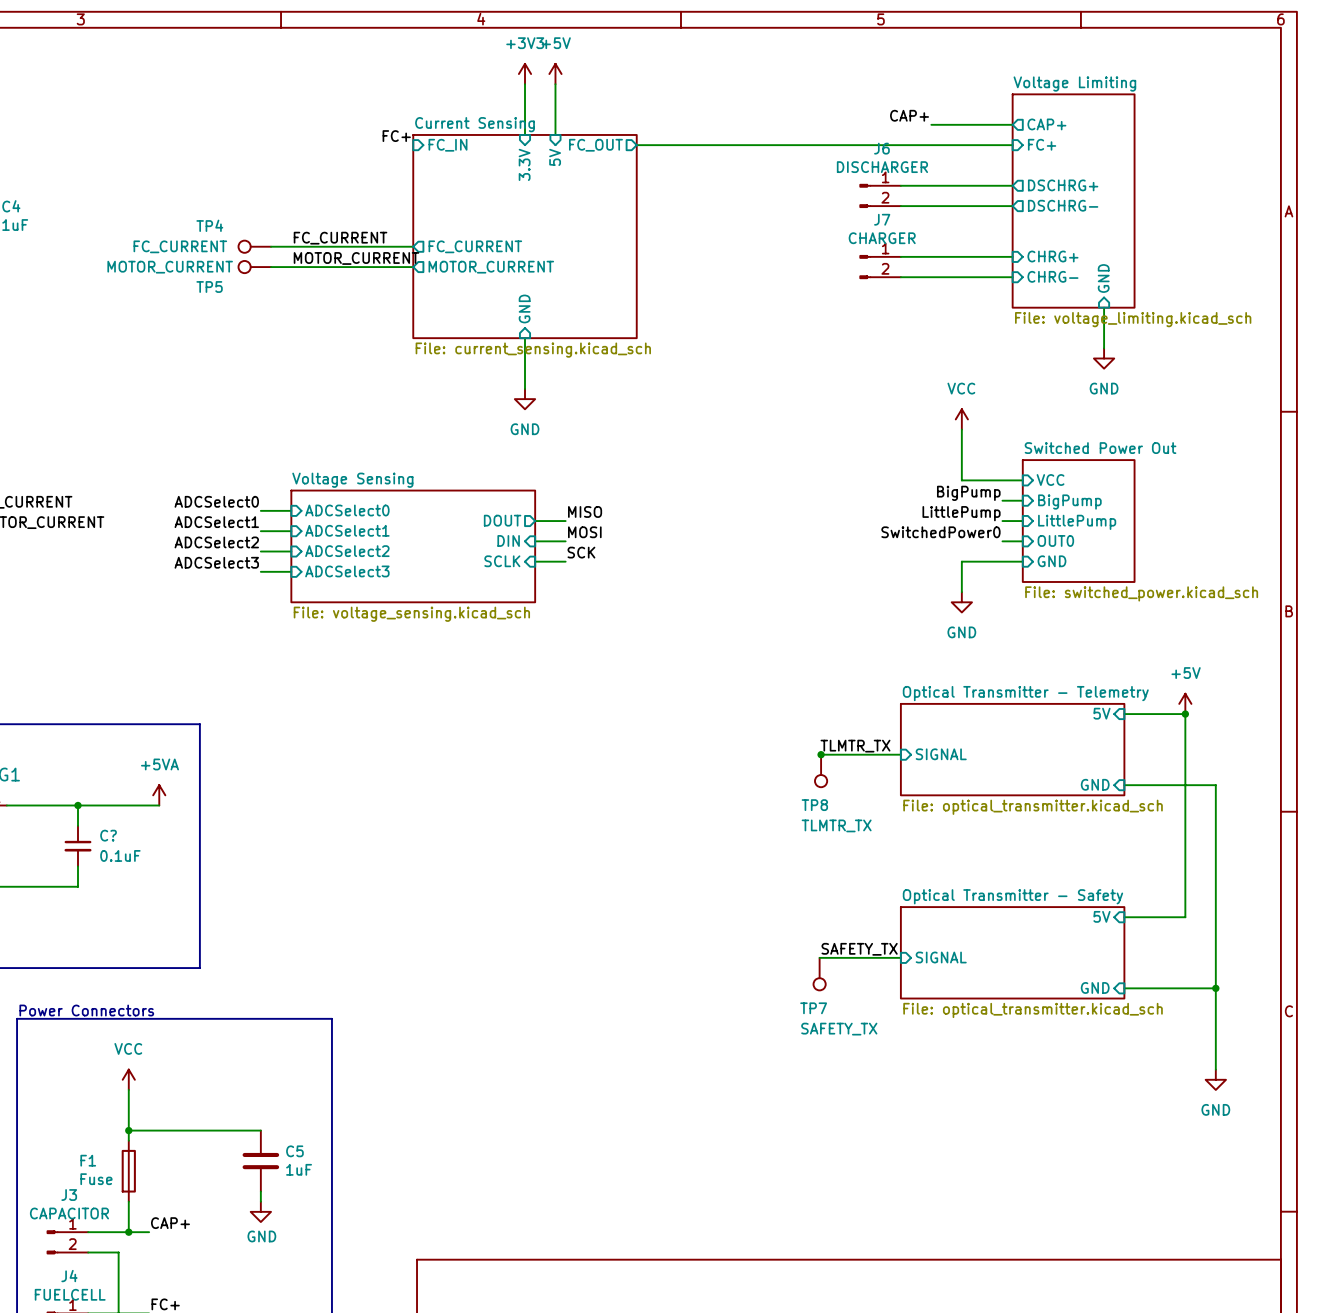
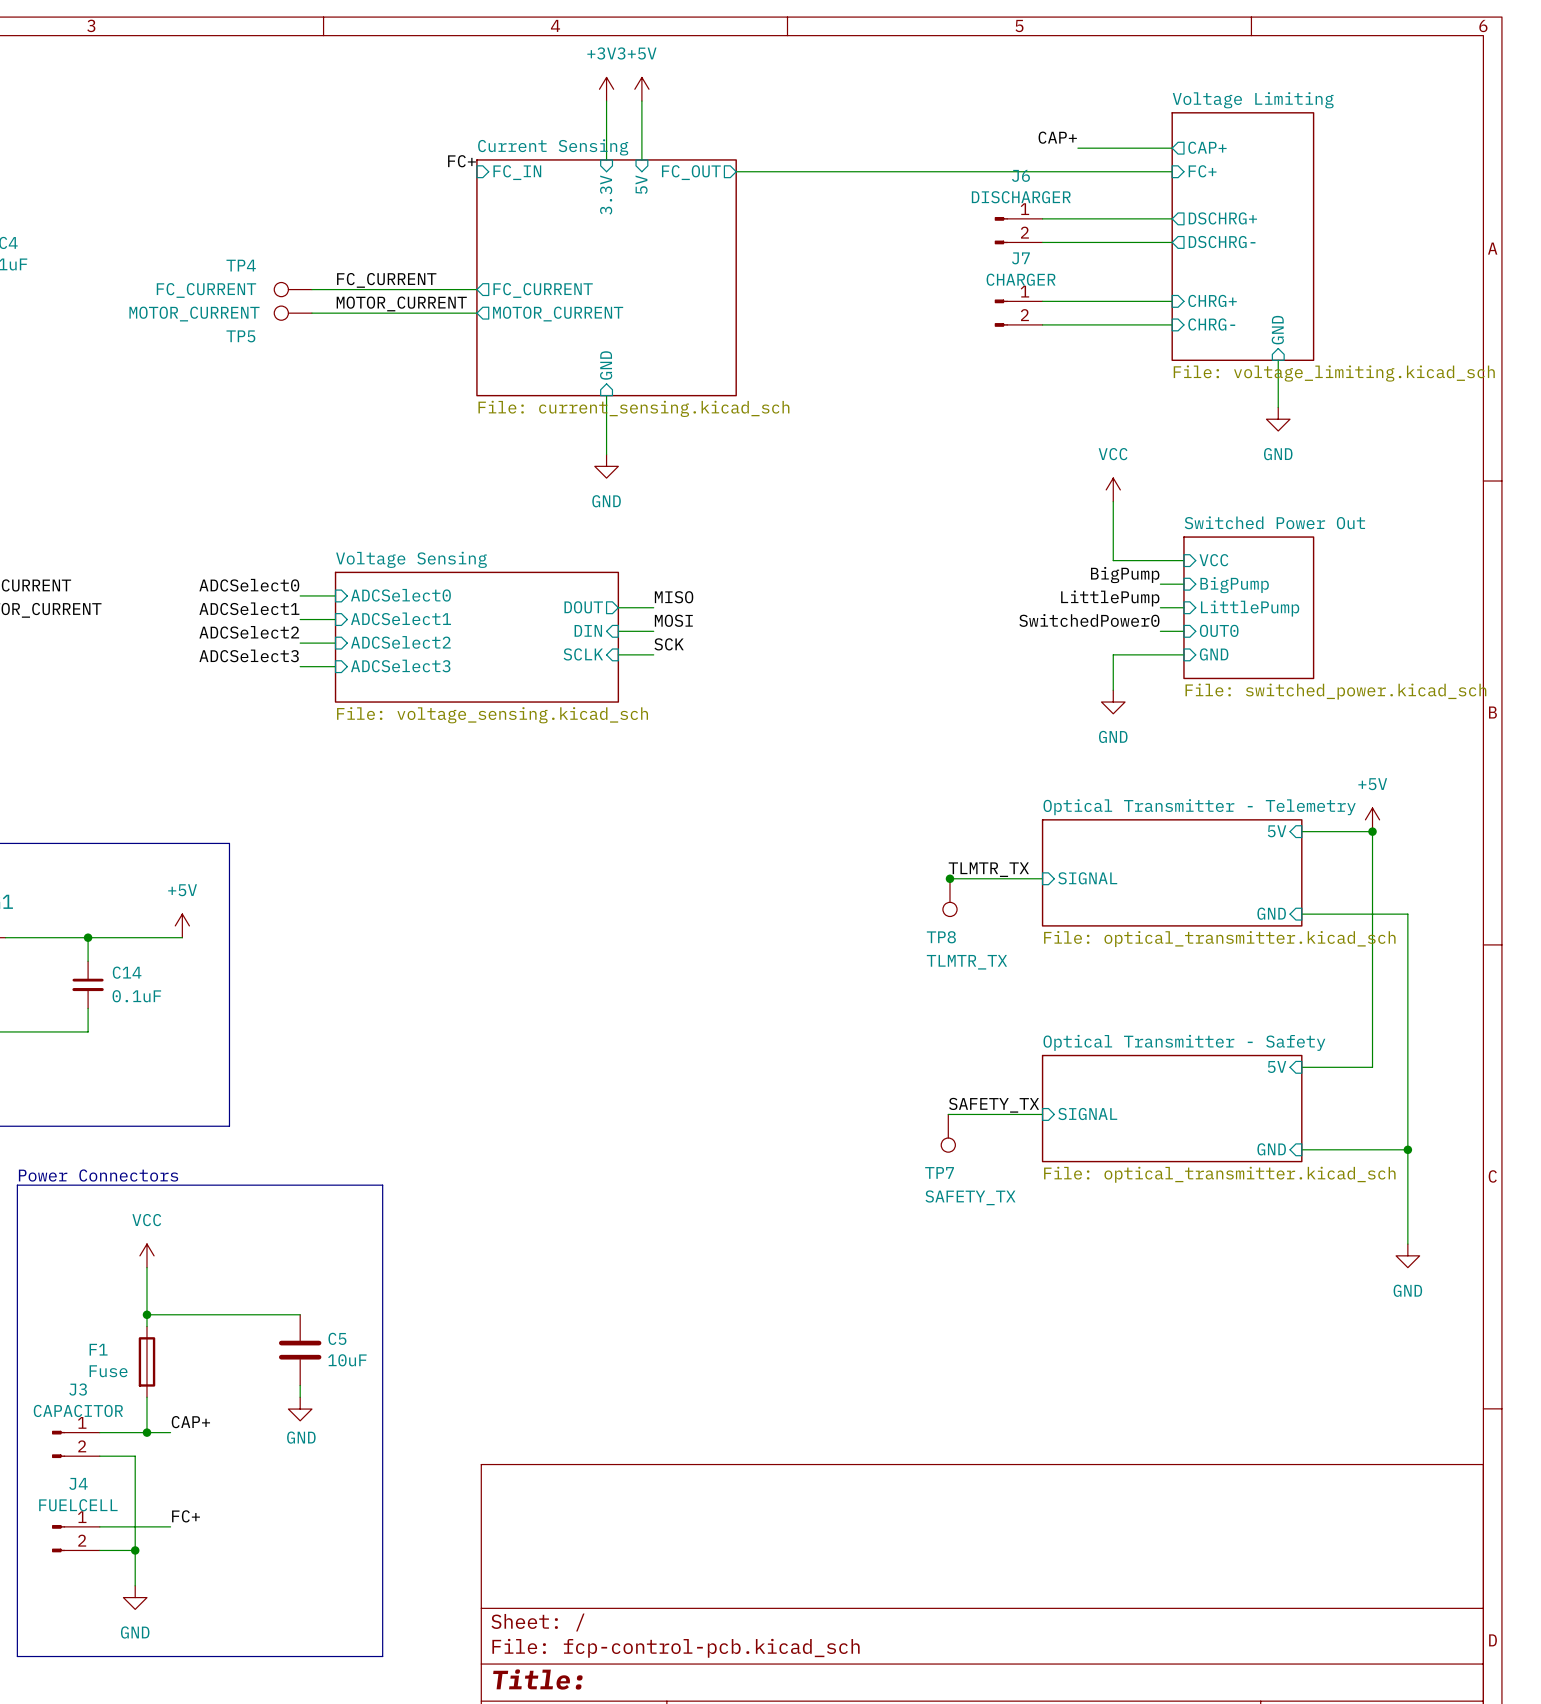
power symbol: +5VA (159, 795) -> +5V (182, 925)
C? name: C? (108, 835) -> C14 (127, 972)
C5 value: 1uF (299, 1169) -> 10uF (347, 1360)

